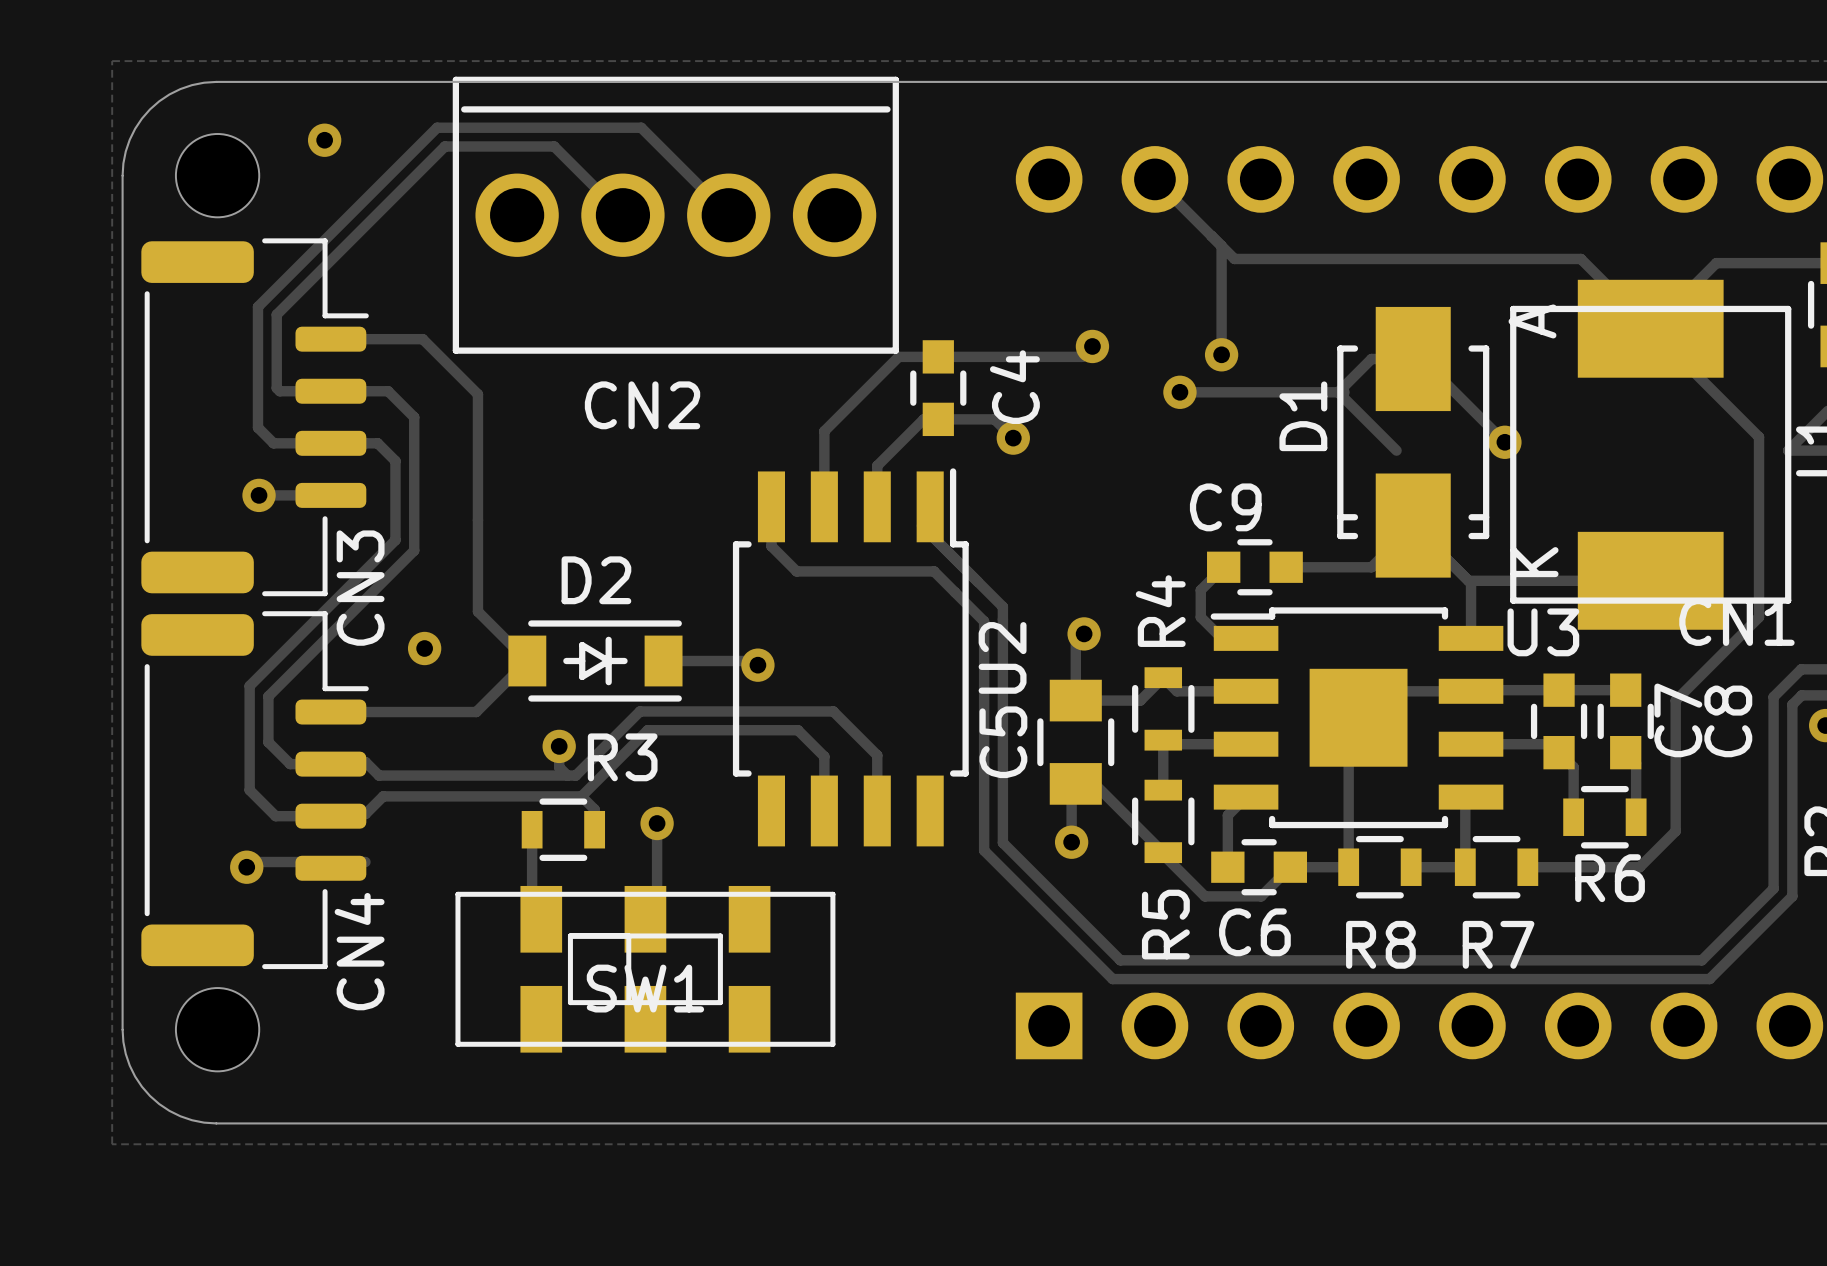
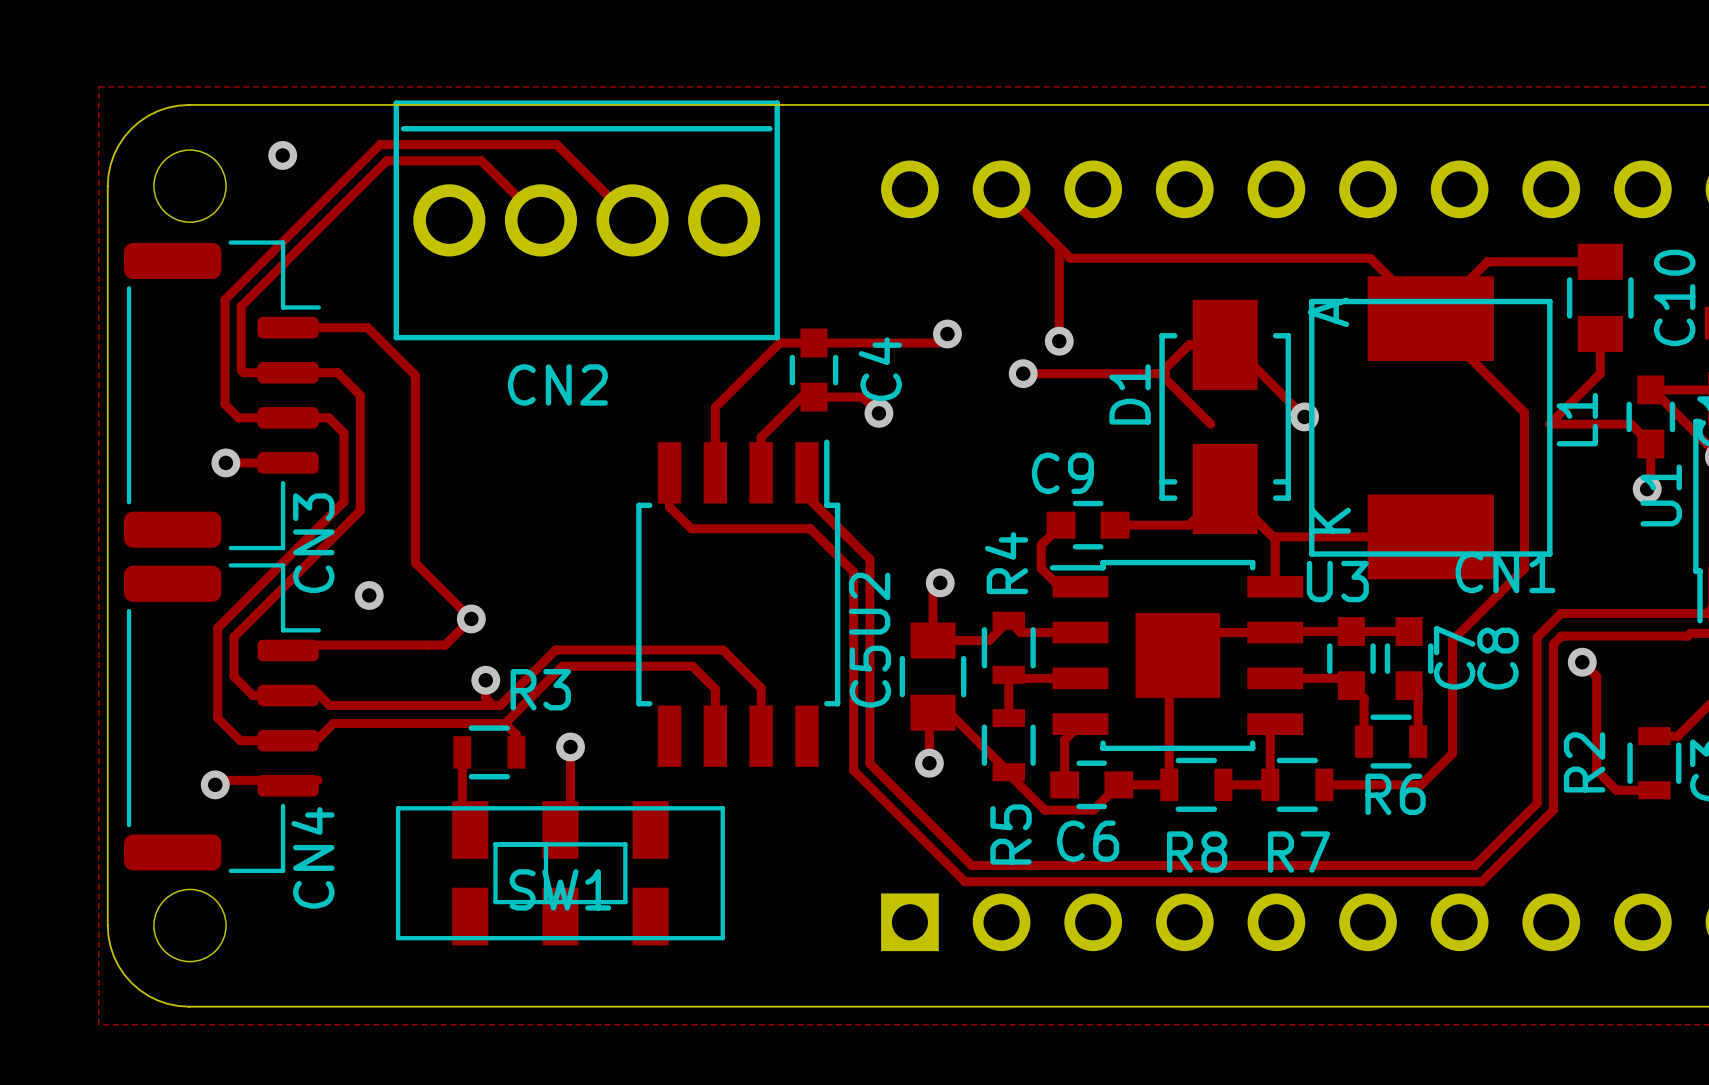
track: (477, 611) (527, 661) (476, 712) (330, 712) -> (415, 563) (471, 618) (445, 645) (318, 645)
D2: (595, 661) -> none
track: (663, 661) (753, 661) (757, 665) -> none
via position: (757, 665) -> (471, 618)

